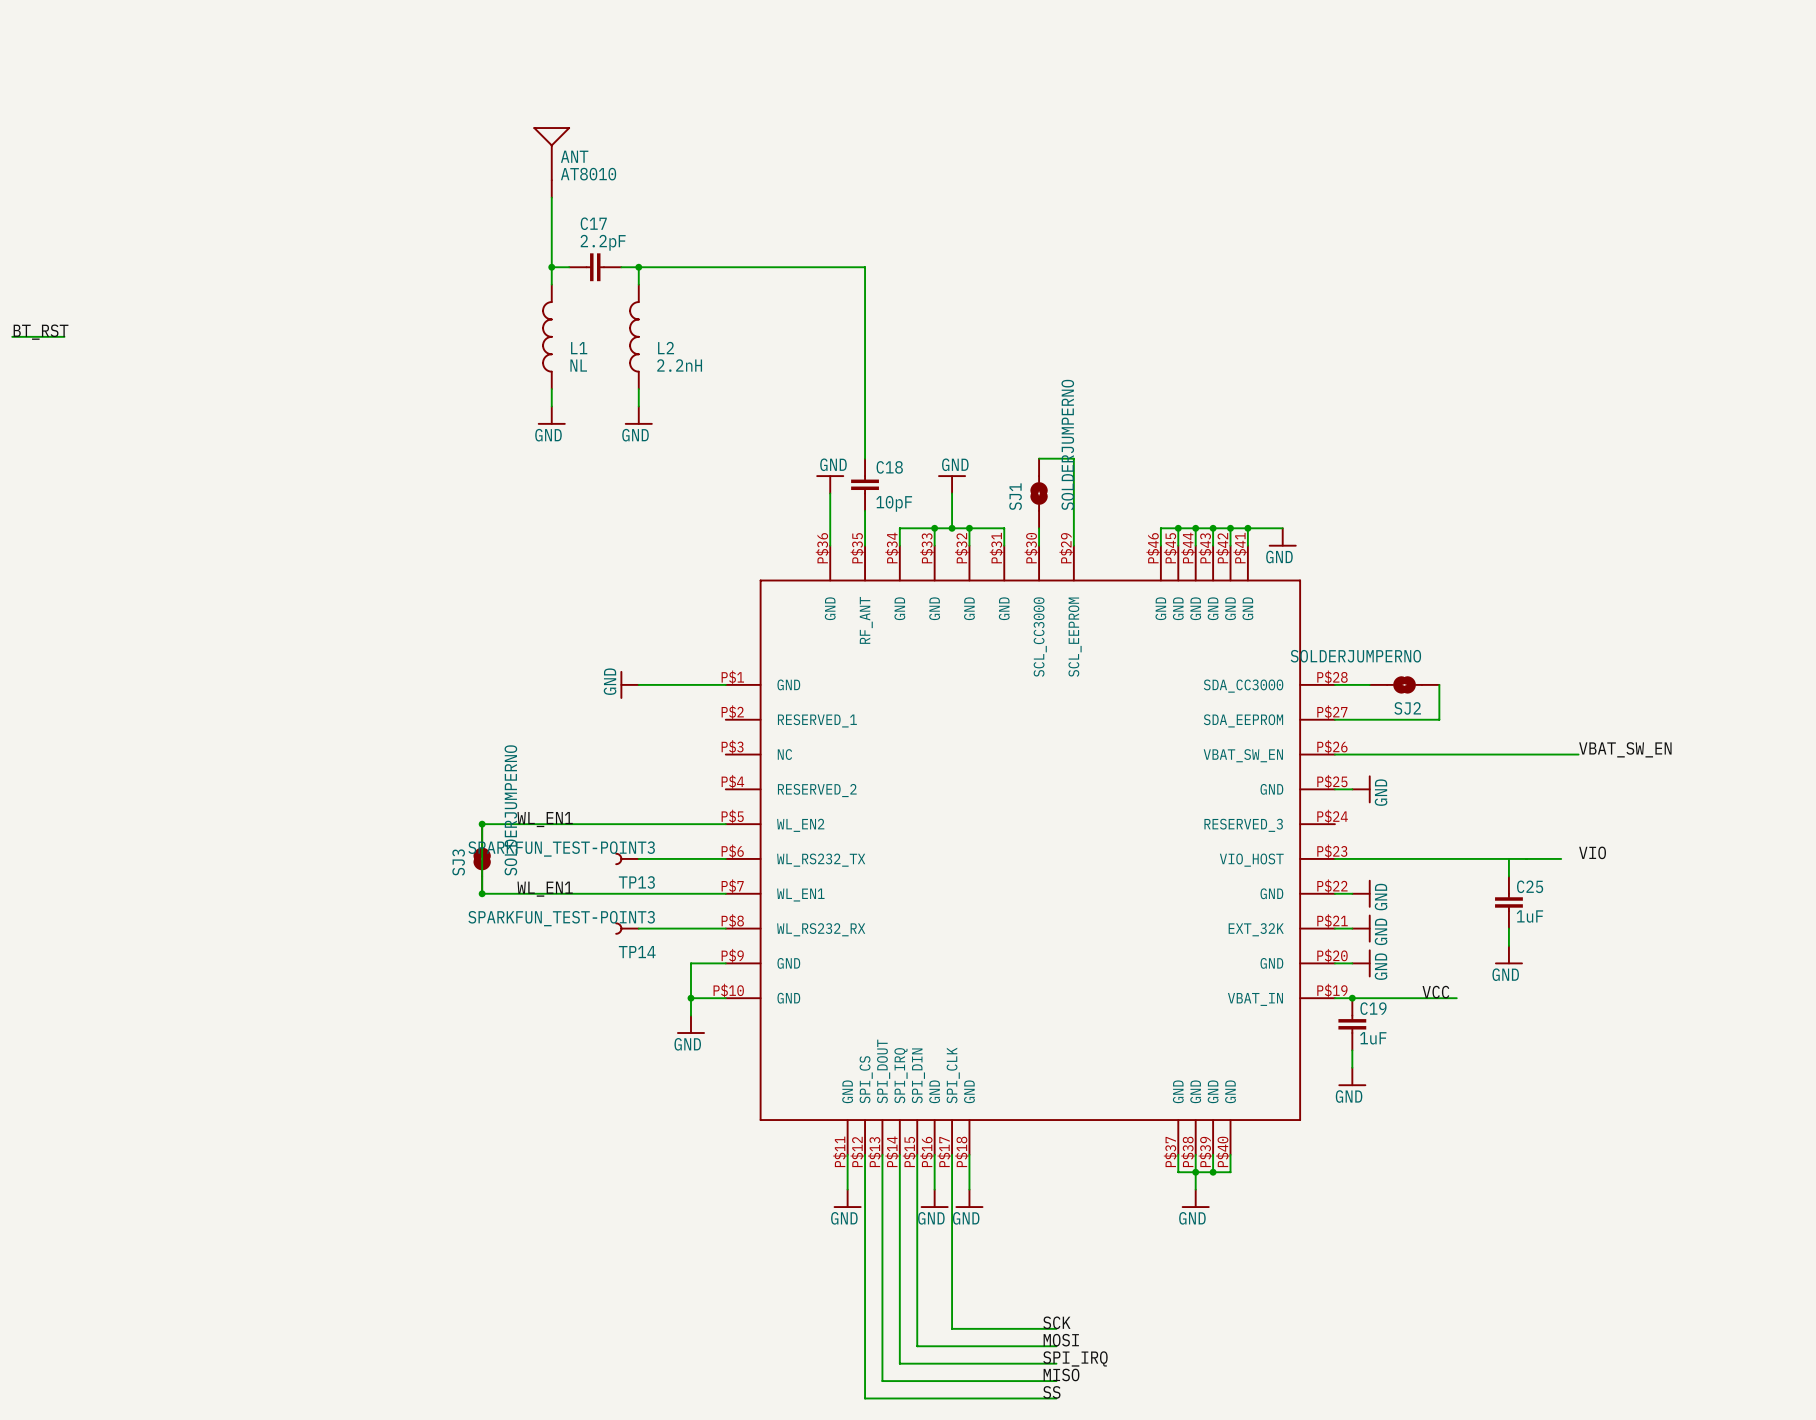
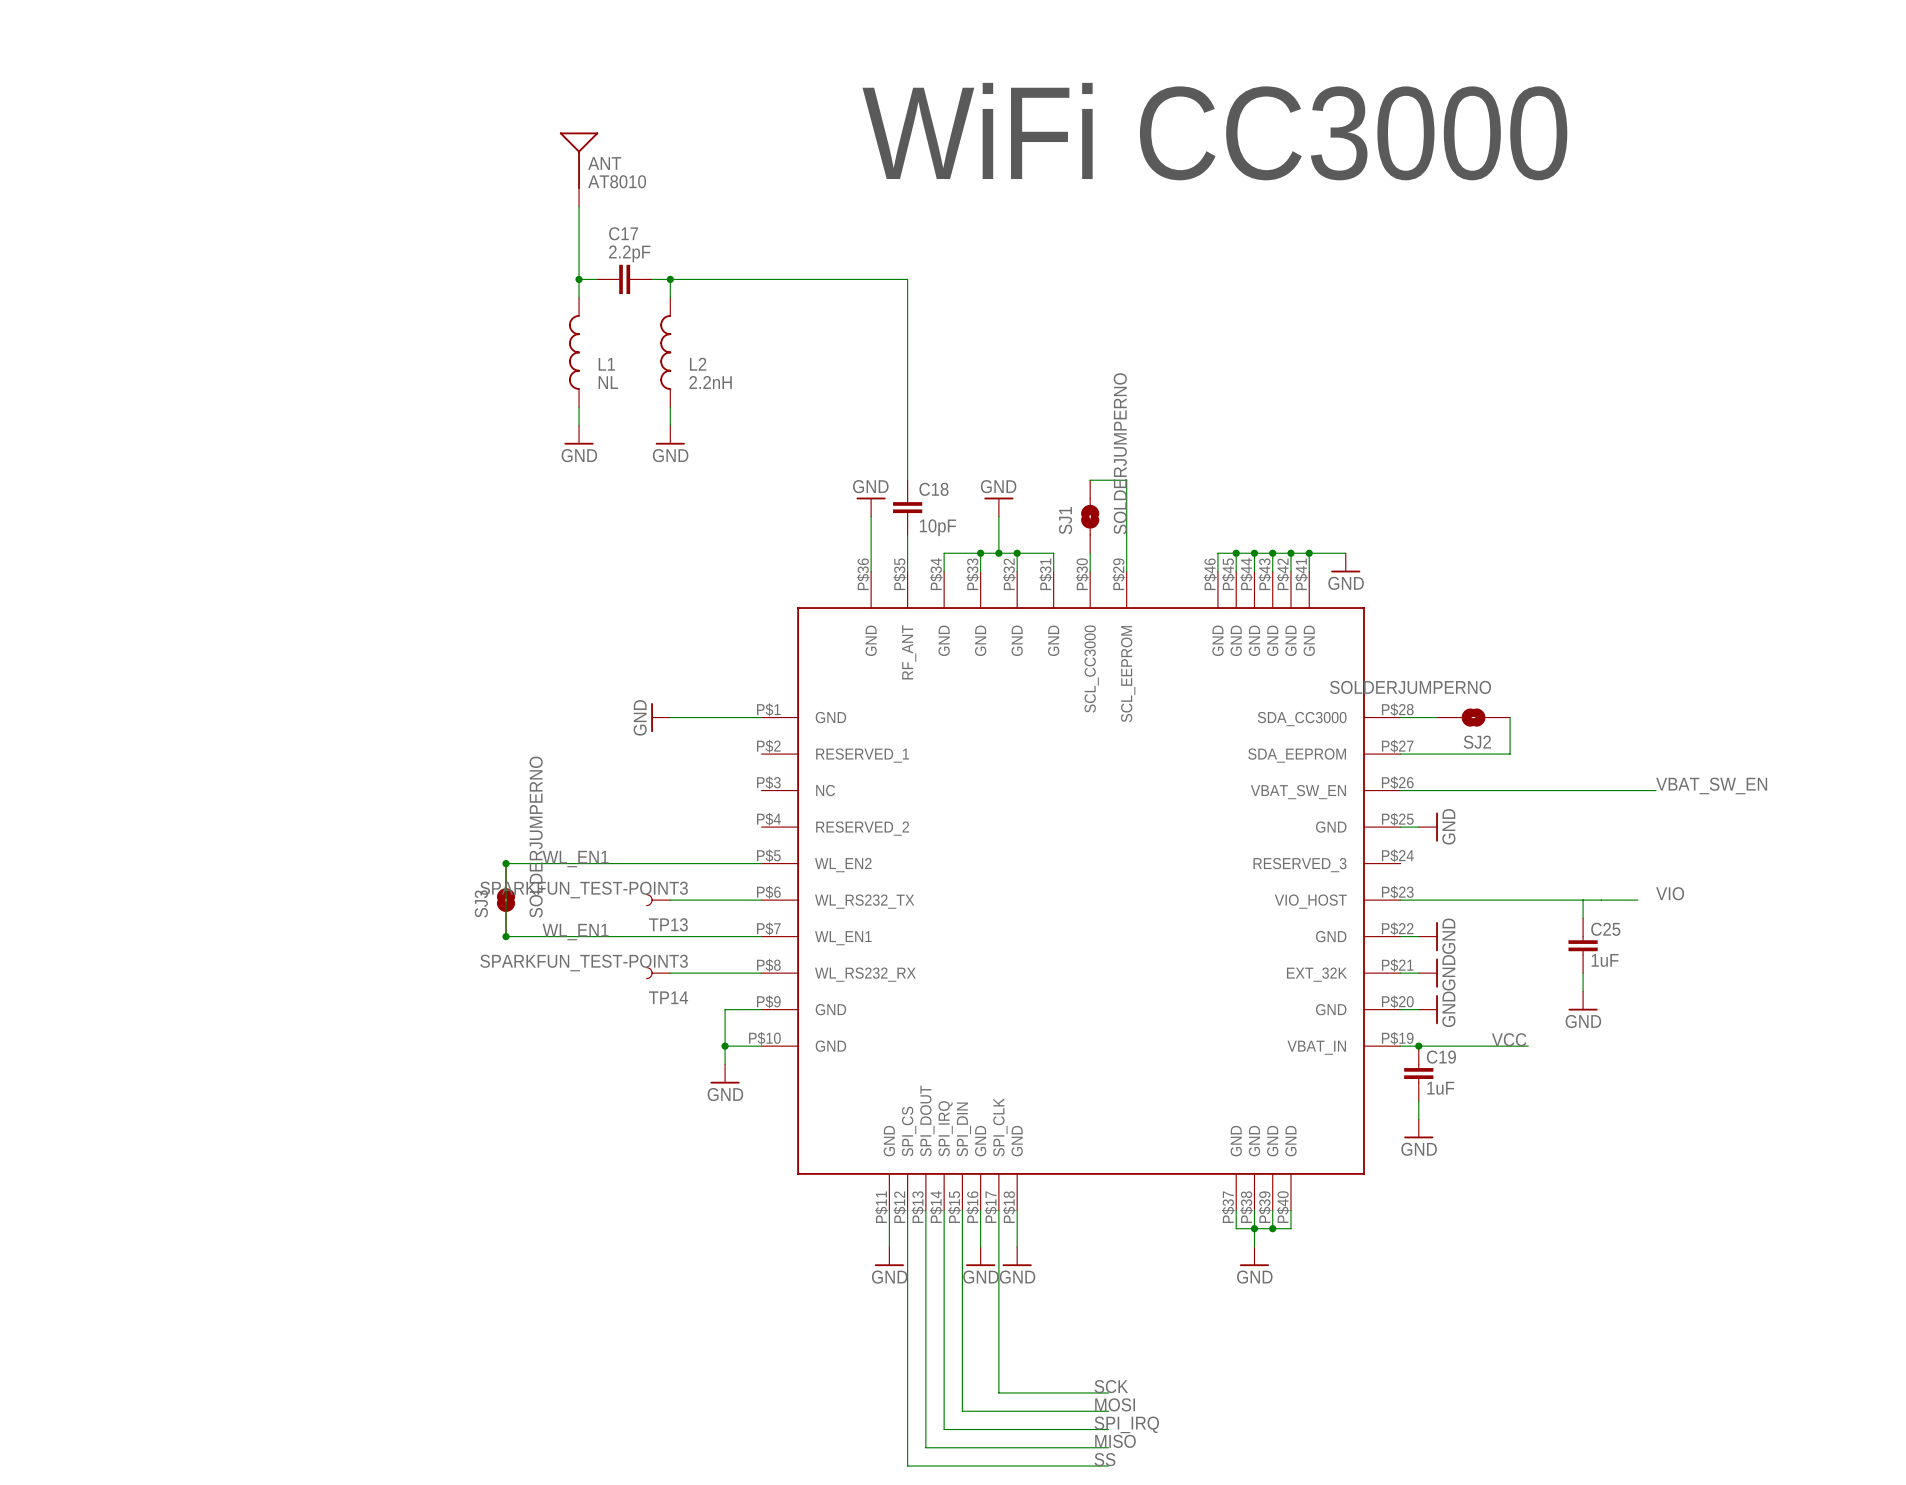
text: none -> WiFi CC3000 (1214, 131)
label: BT_RST (41, 332) -> none
wire: (12, 336) (64, 336) -> none

